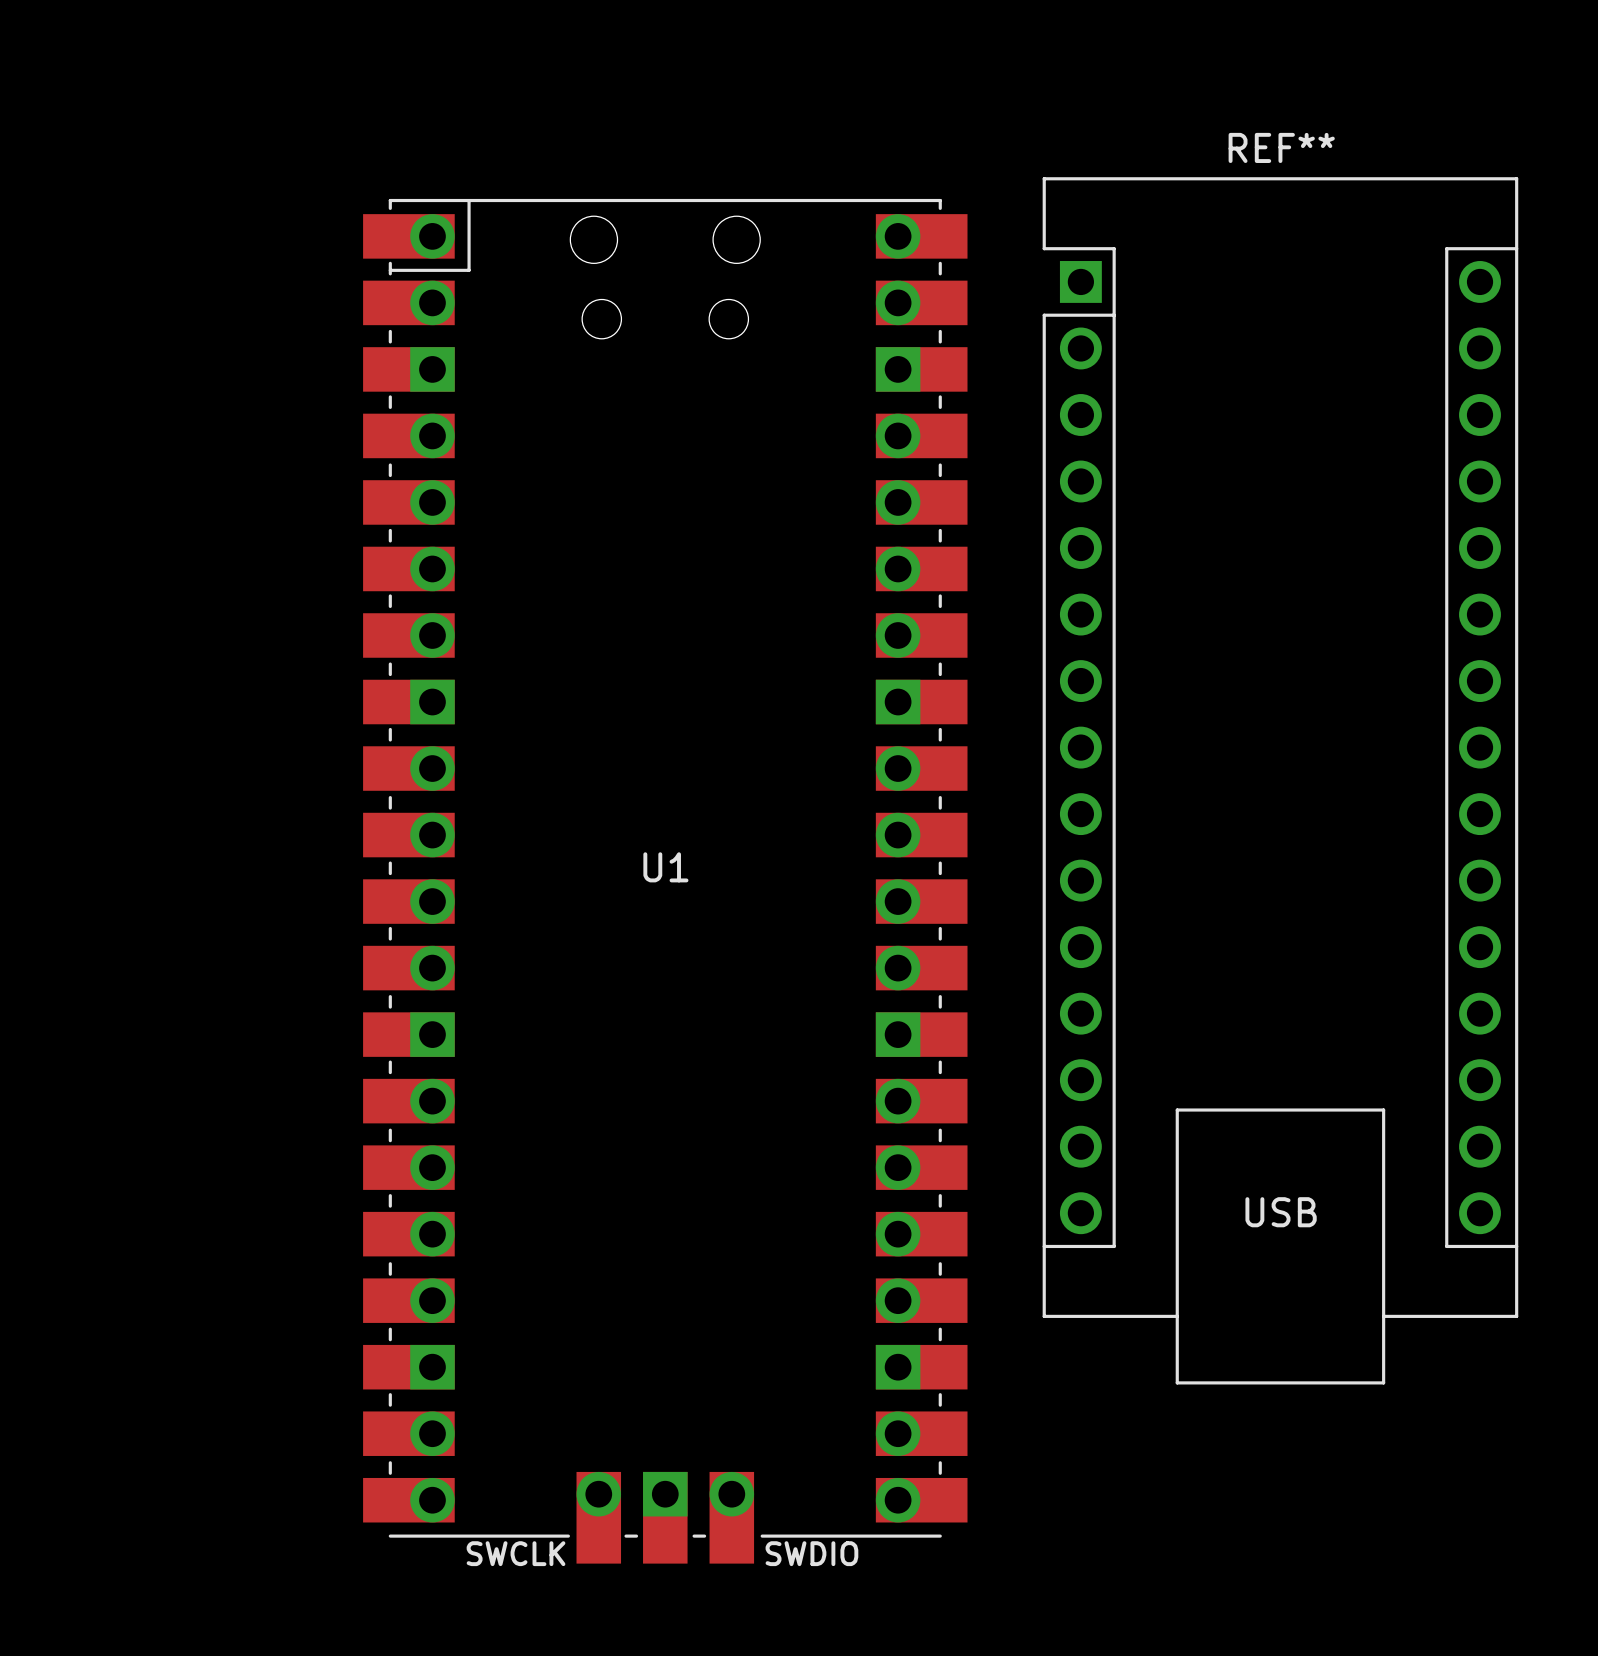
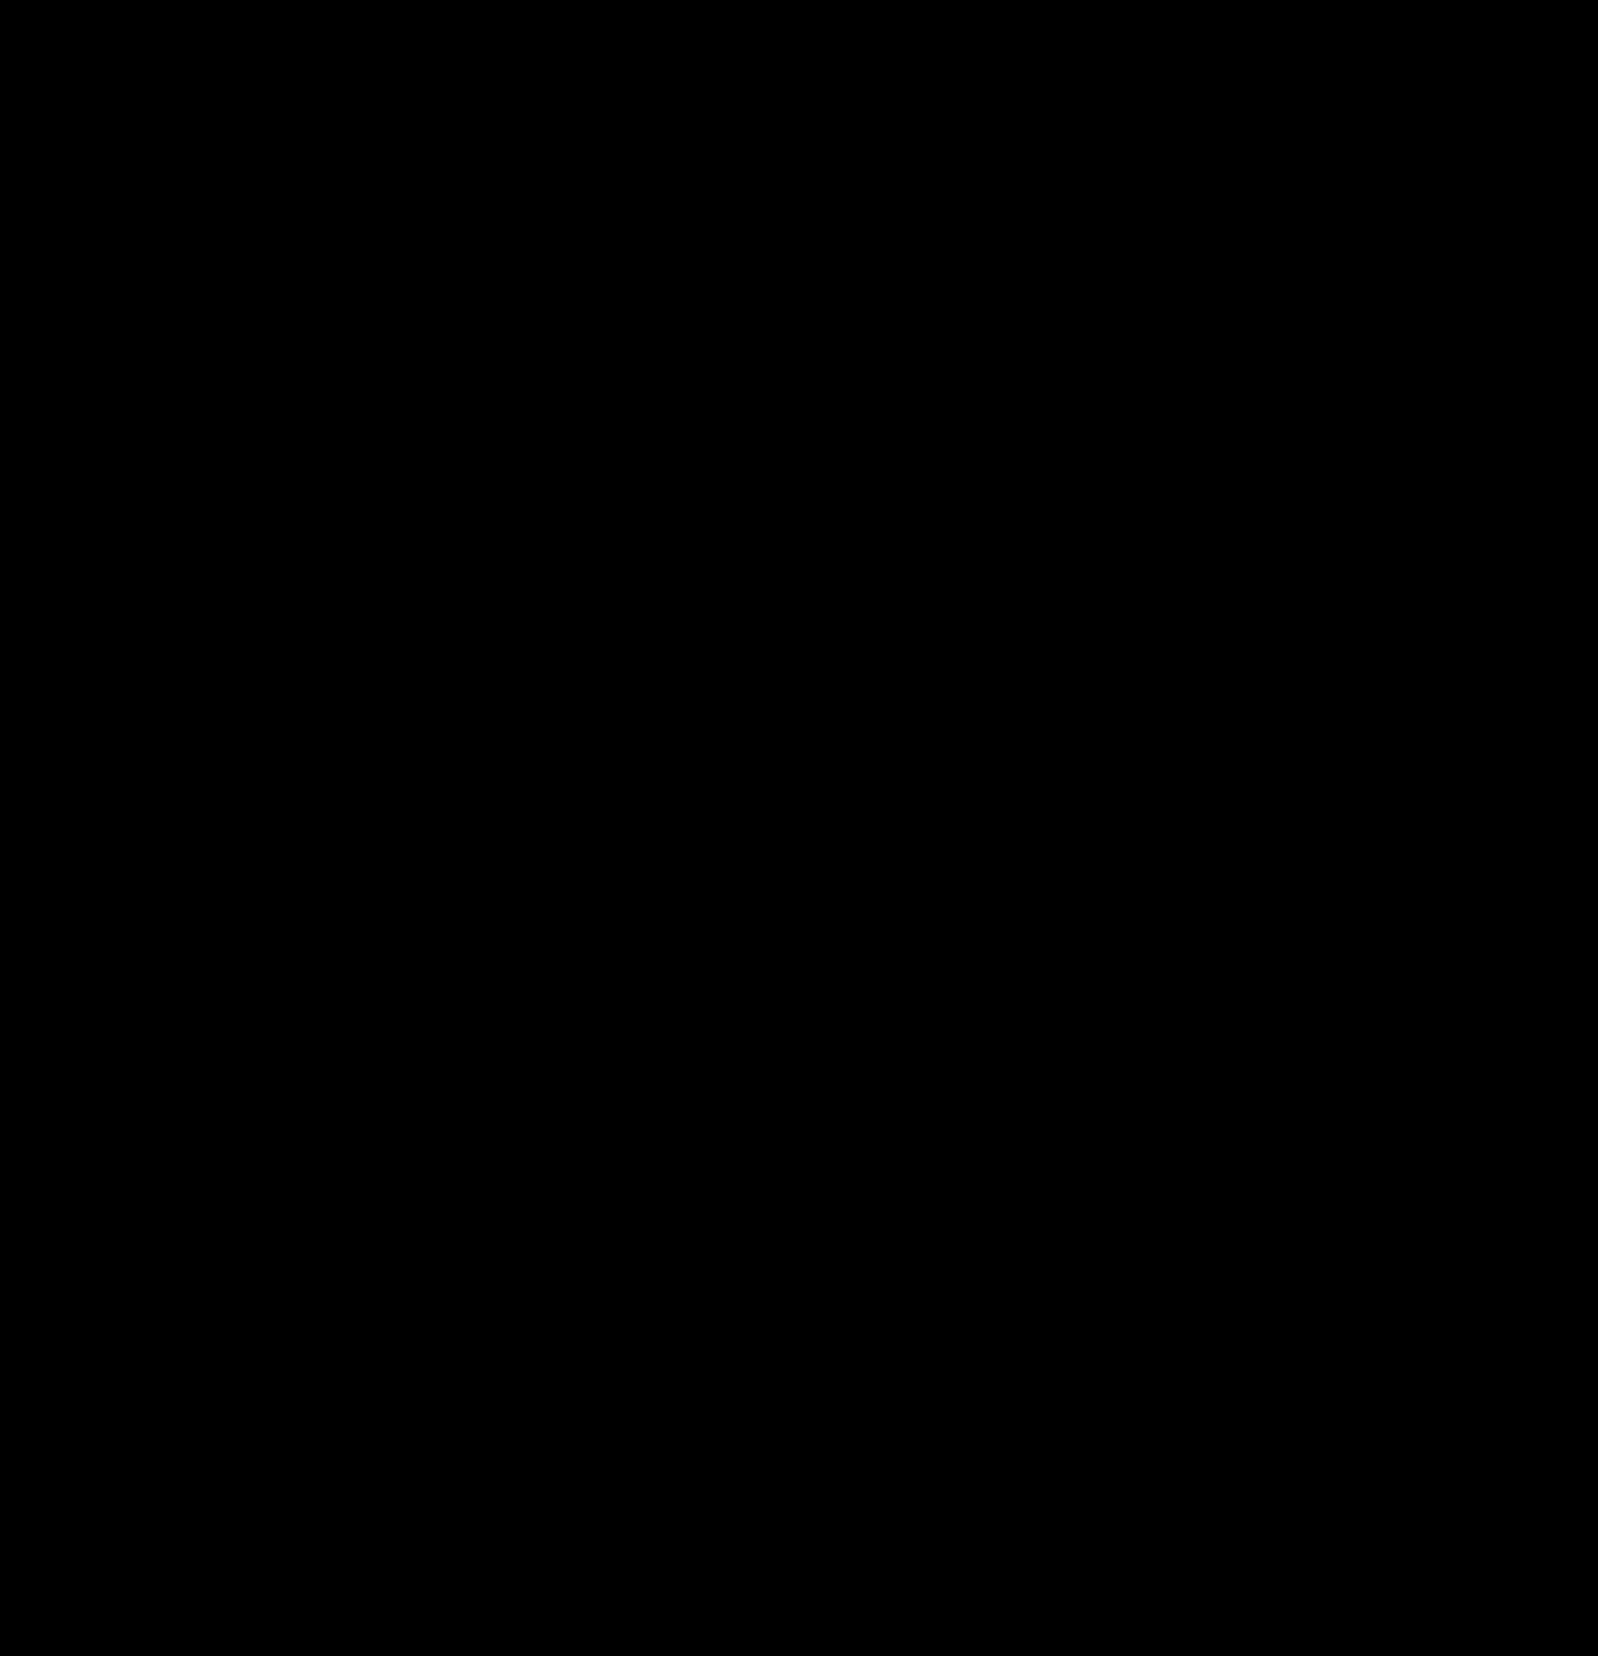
REF**: (1280, 780) -> none
U1: (665, 881) -> none

